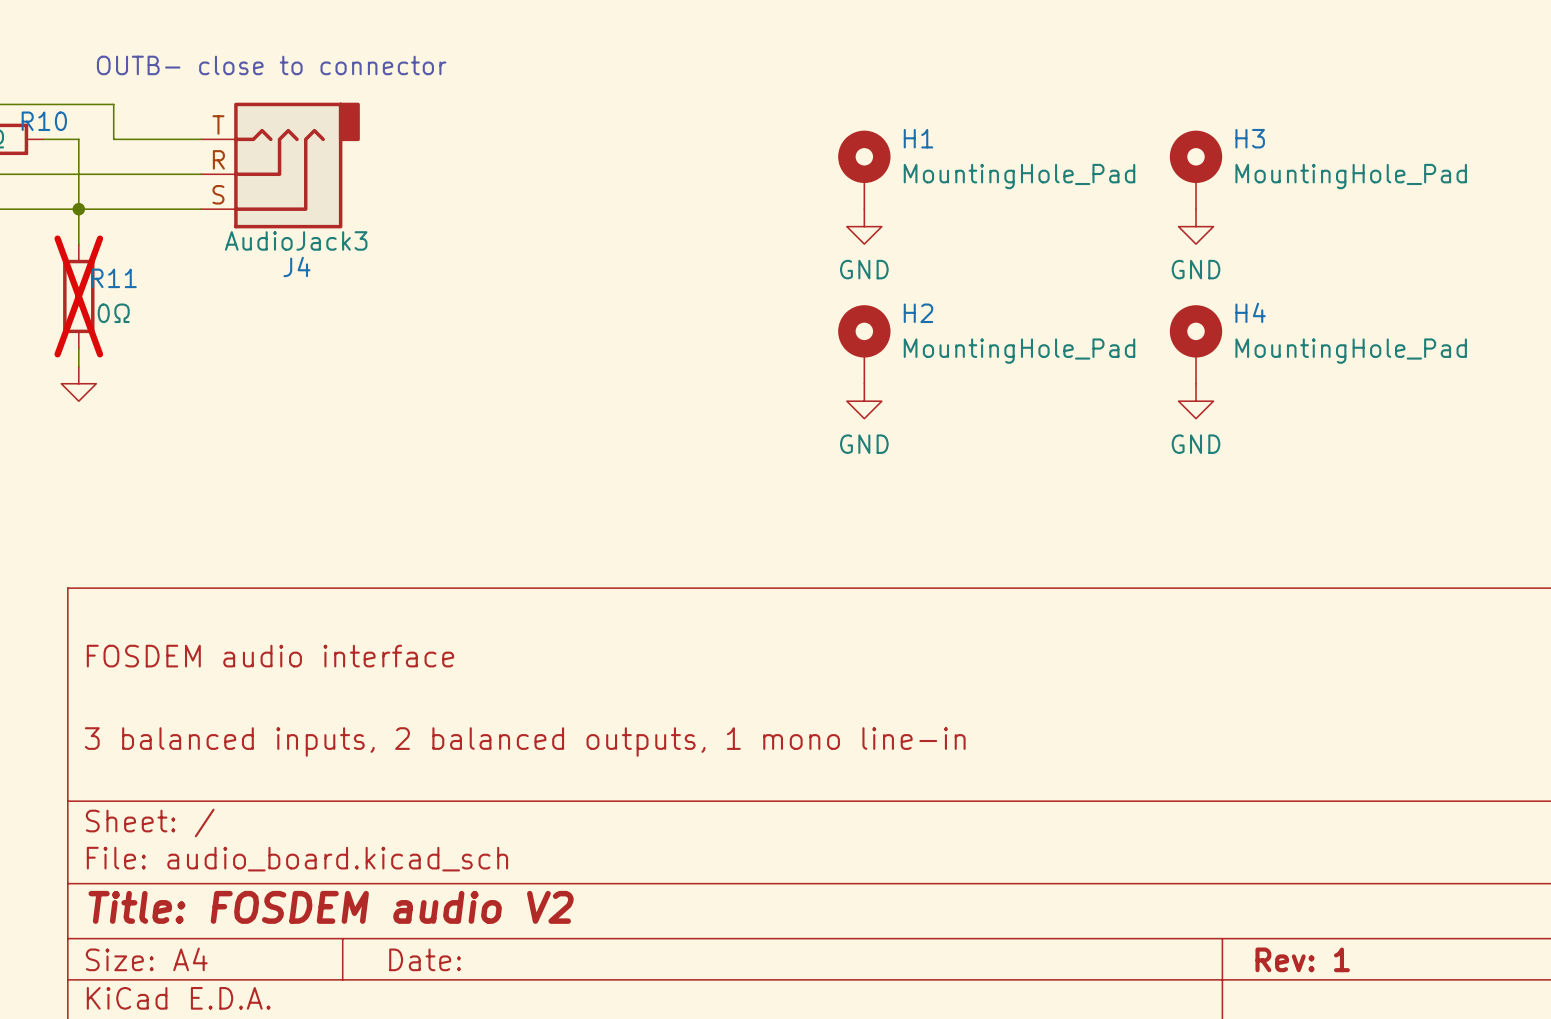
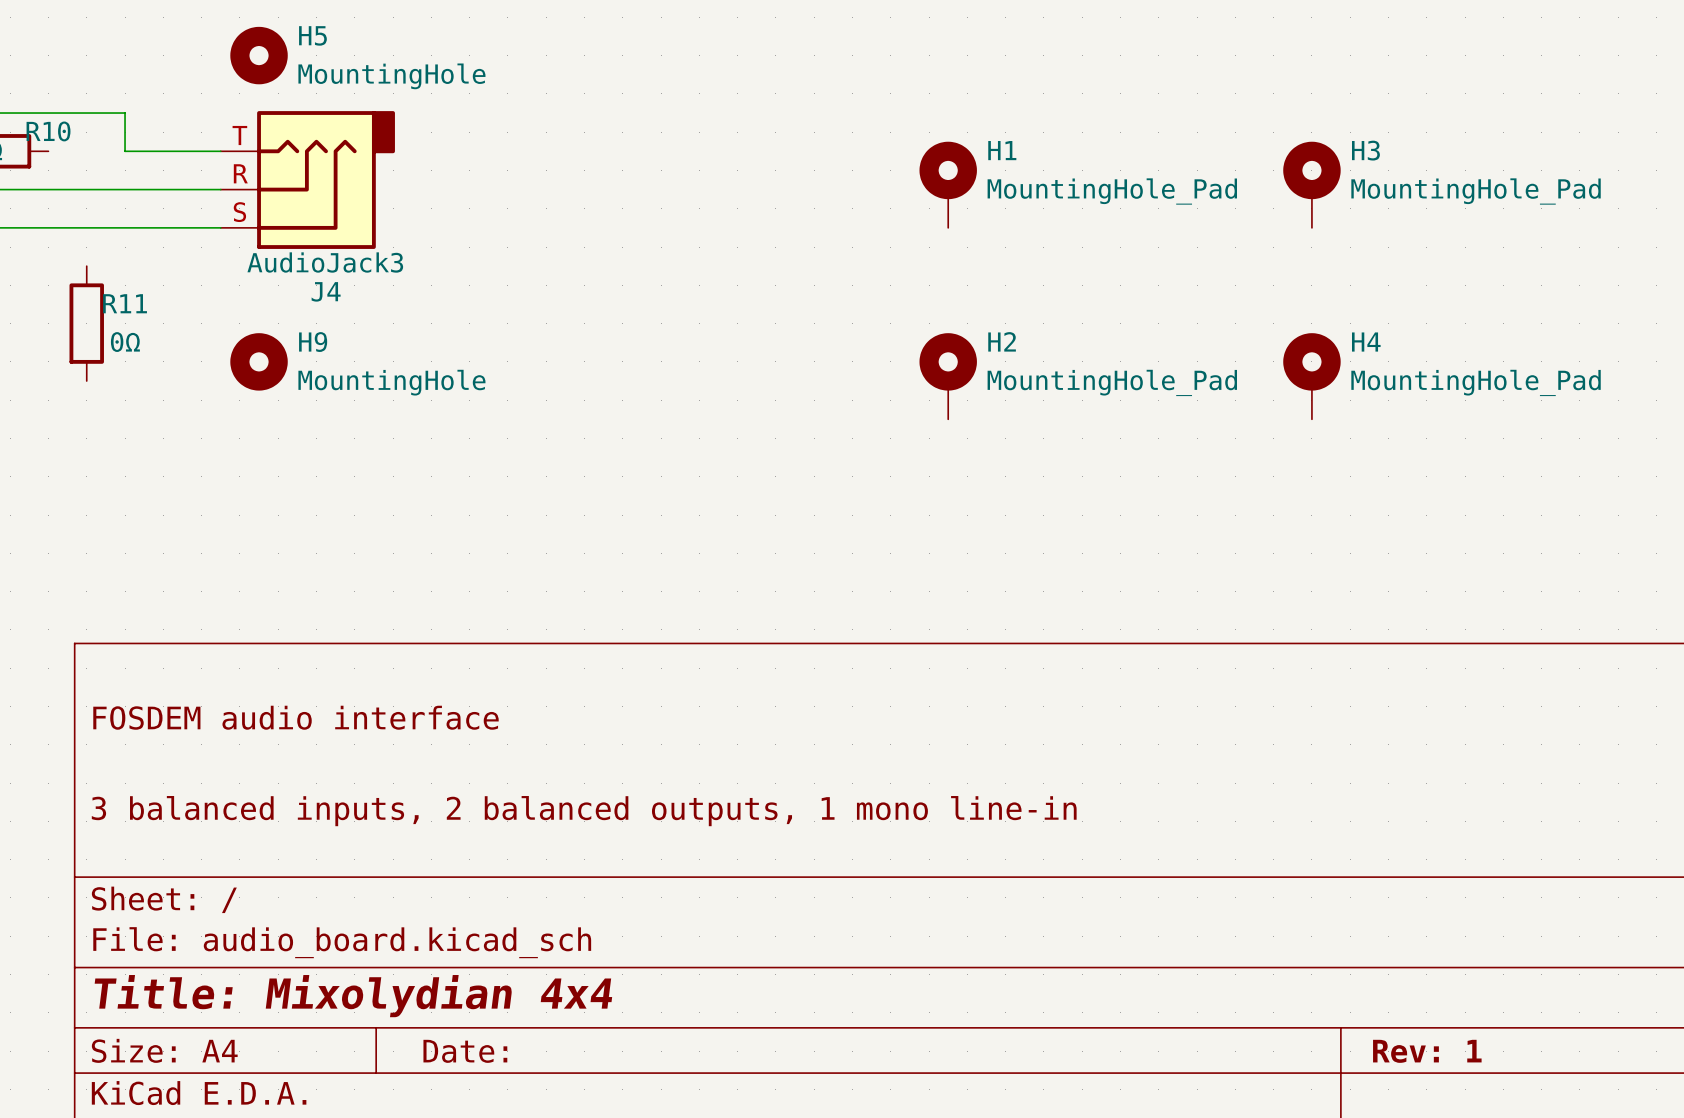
H5: none -> MountingHole (259, 55)
text: OUTB- close to connector (271, 65) -> none
wire: (43, 139) (78, 139) (78, 244) -> none
junction: (78, 209) -> none
power symbol: GND (864, 226) -> none
power symbol: GND (1196, 226) -> none
R11 do-not-place cross: (78, 296) -> none
H9: none -> MountingHole (259, 361)
wire: (78, 348) (78, 366) -> none
power symbol: (78, 383) -> none
power symbol: GND (864, 401) -> none
power symbol: GND (1196, 401) -> none
title block: Title: FOSDEM audio V2 (331, 907) -> Title: Mixolydian 4x4 (353, 996)

